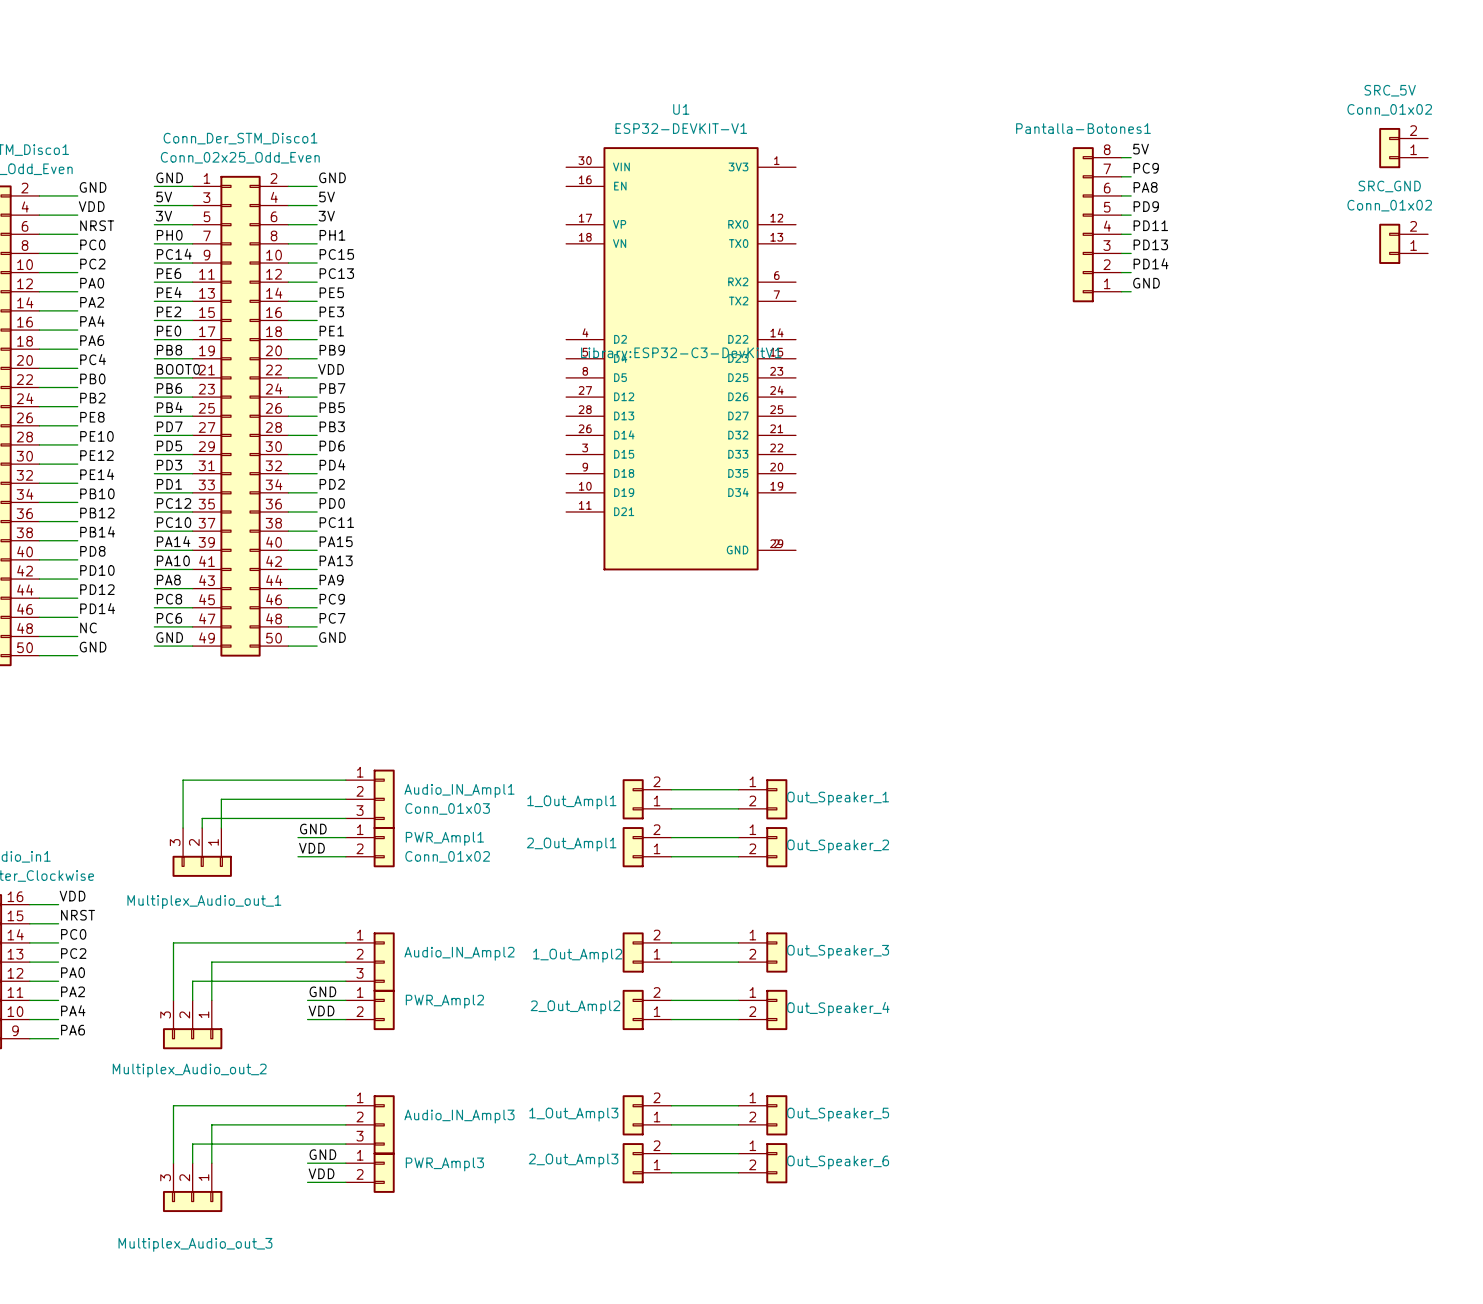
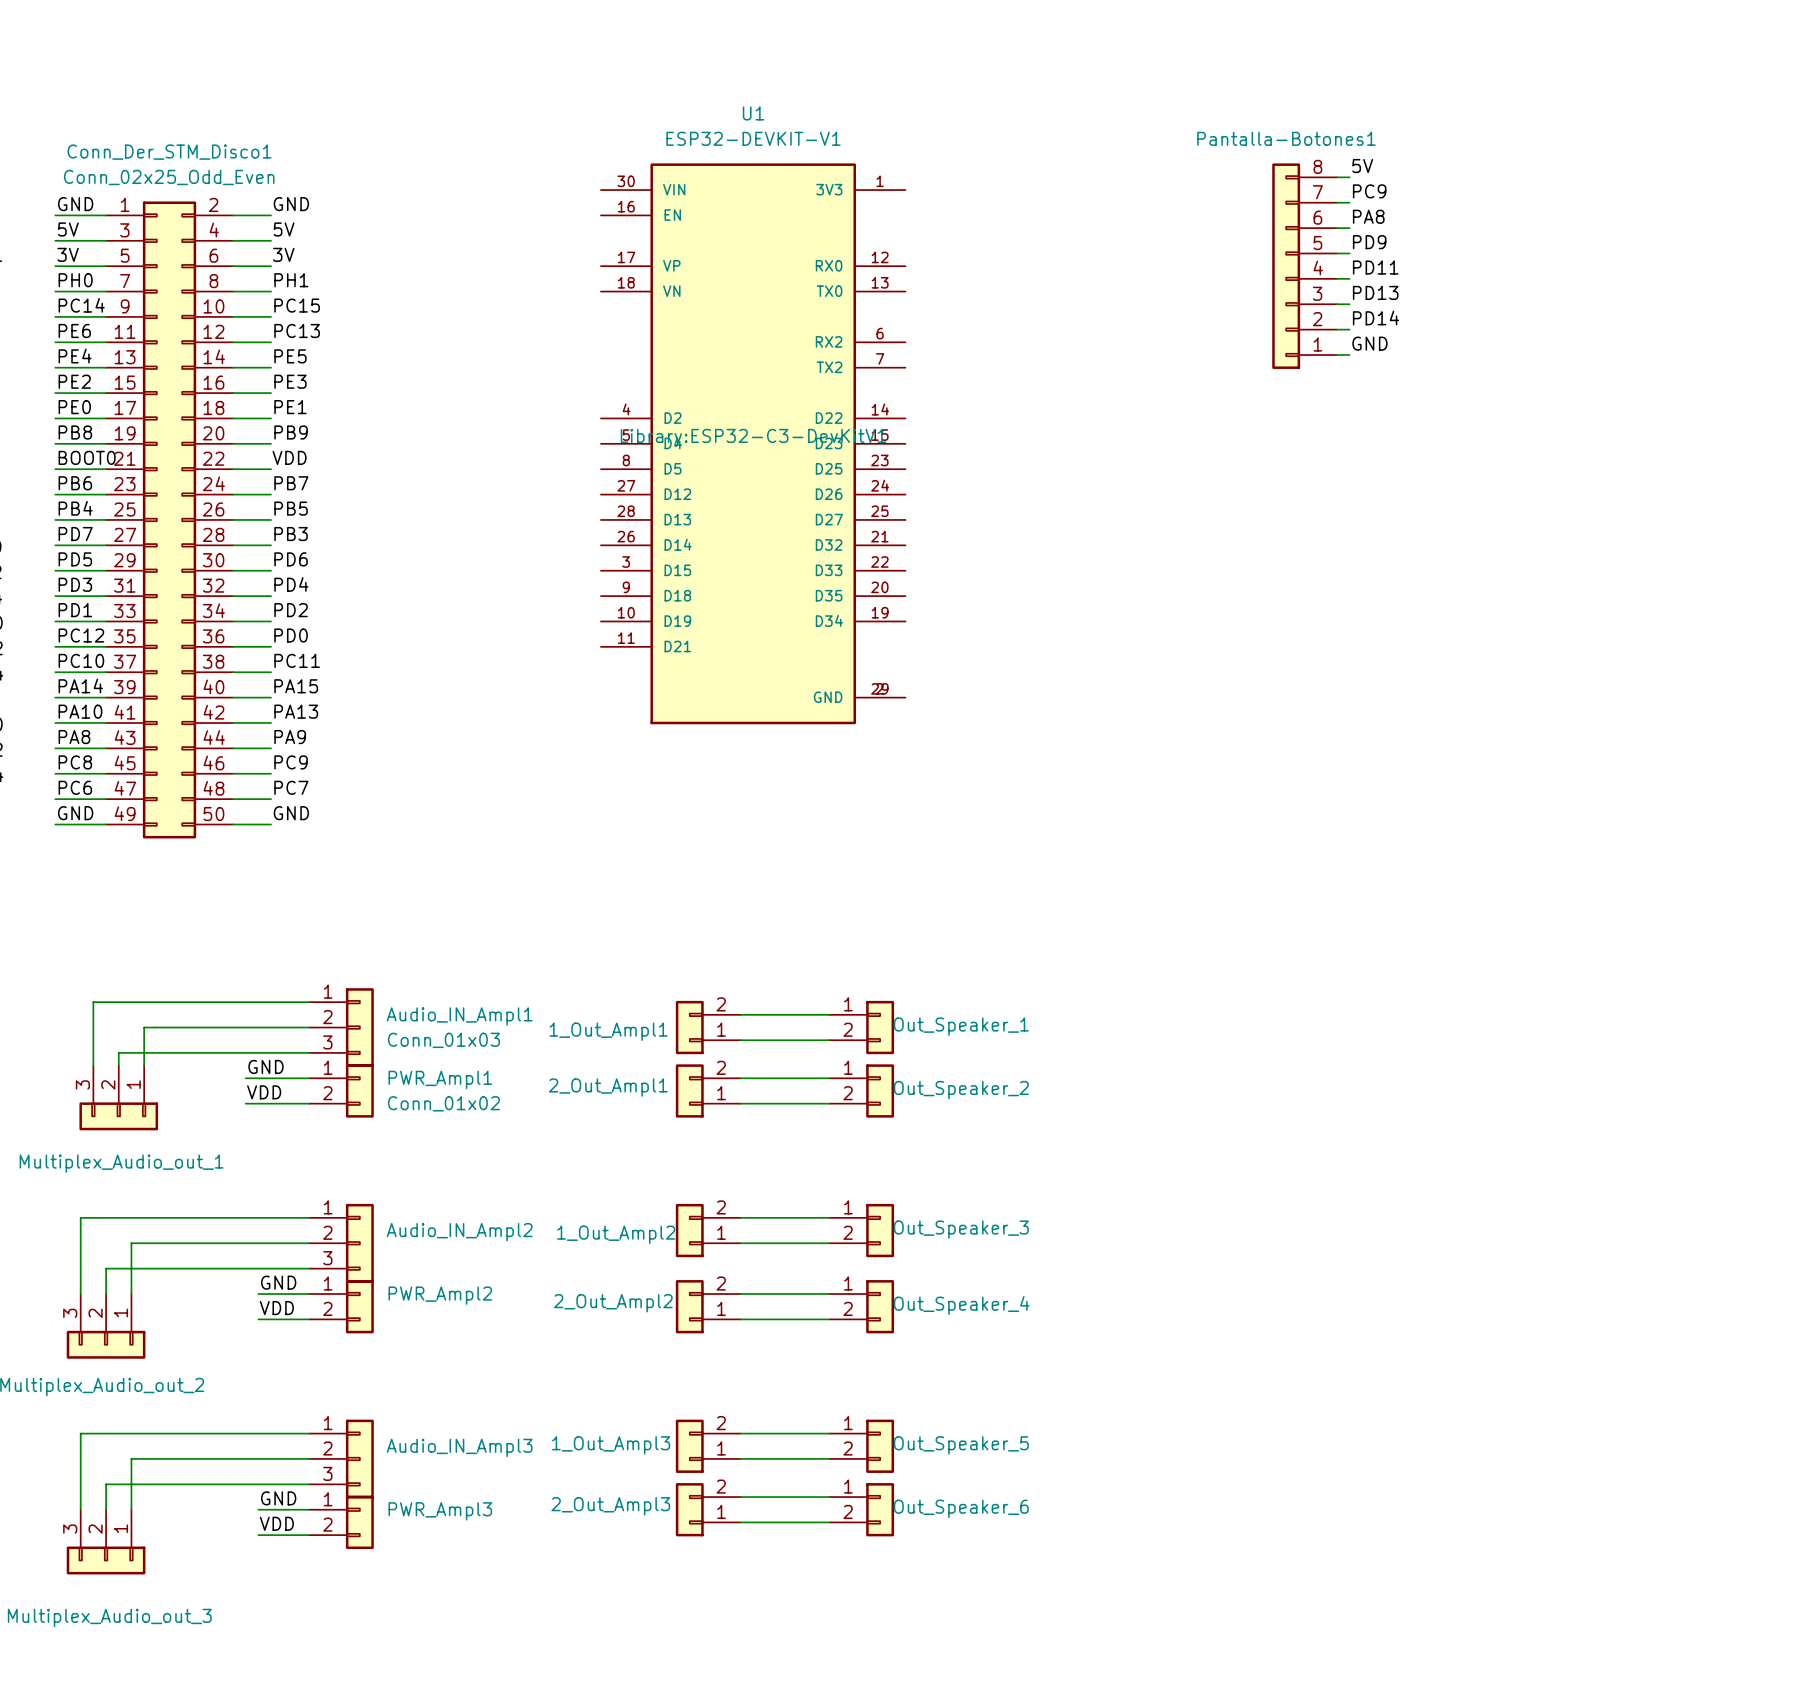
SRC_5V: Conn_01x02 (1403, 148) -> none
SRC_GND: Conn_01x02 (1403, 243) -> none

